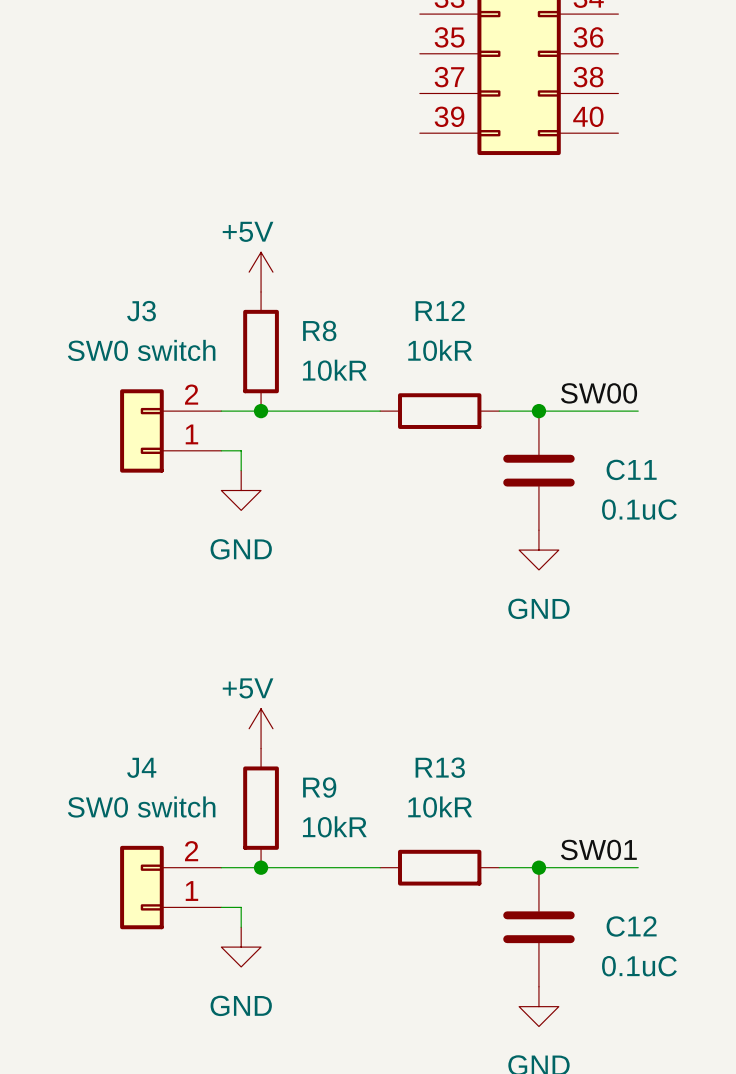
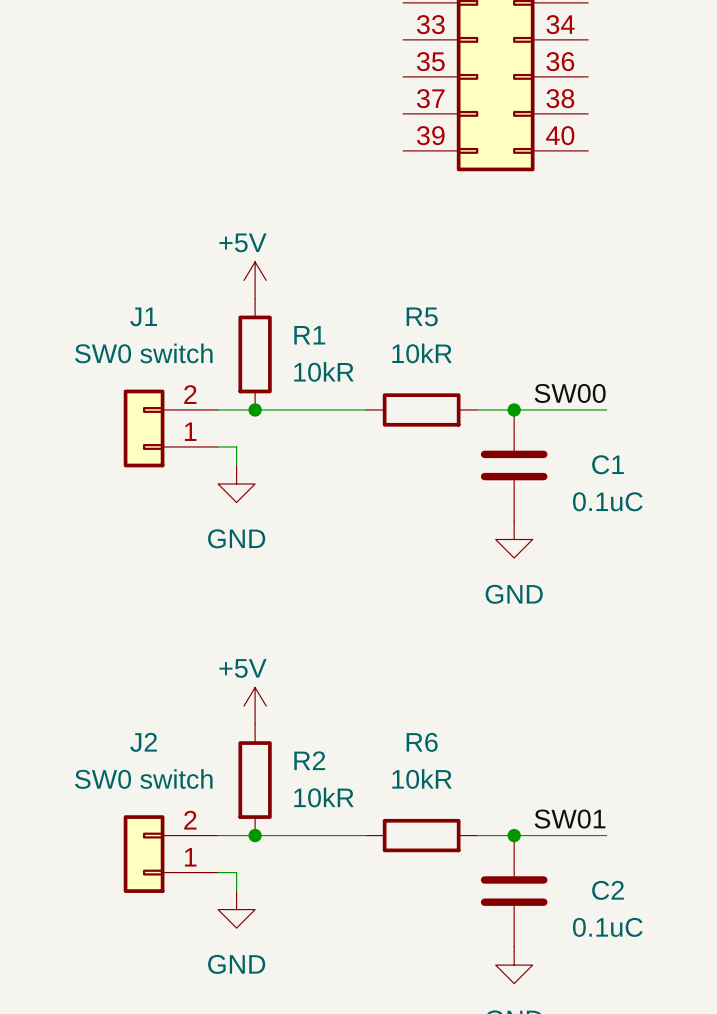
R12 name: R12 (440, 310) -> R5 (422, 316)
J3 name: J3 (141, 311) -> J1 (143, 316)
R8 name: R8 (319, 330) -> R1 (309, 335)
C11 name: C11 (631, 469) -> C1 (608, 464)
J4 name: J4 (141, 767) -> J2 (143, 742)
R13 name: R13 (440, 767) -> R6 (422, 742)
R9 name: R9 (319, 787) -> R2 (309, 760)
C12 name: C12 (631, 926) -> C2 (608, 890)

